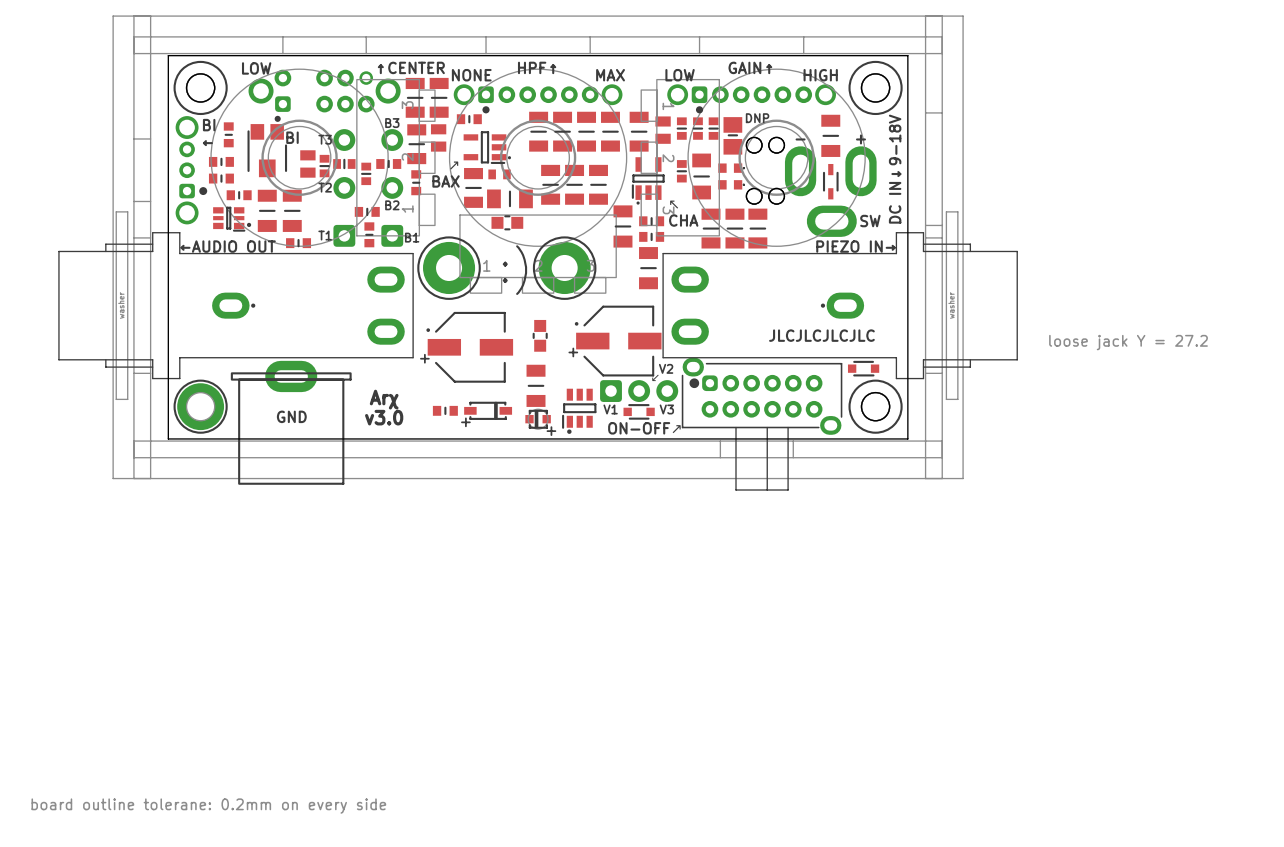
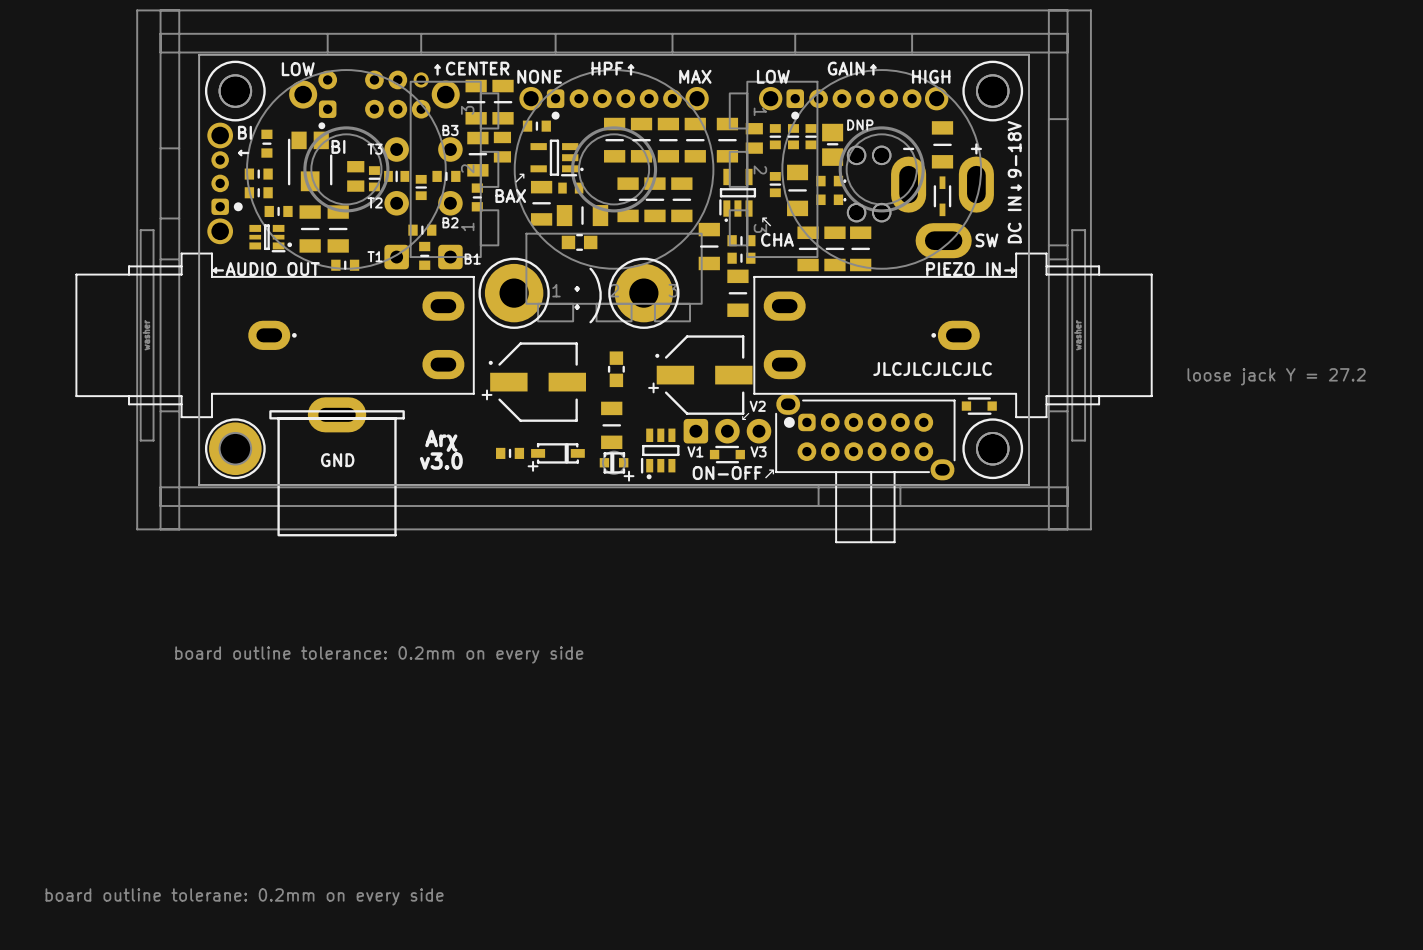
text: none -> board outline tolerance: 0.2mm on every side (379, 654)

